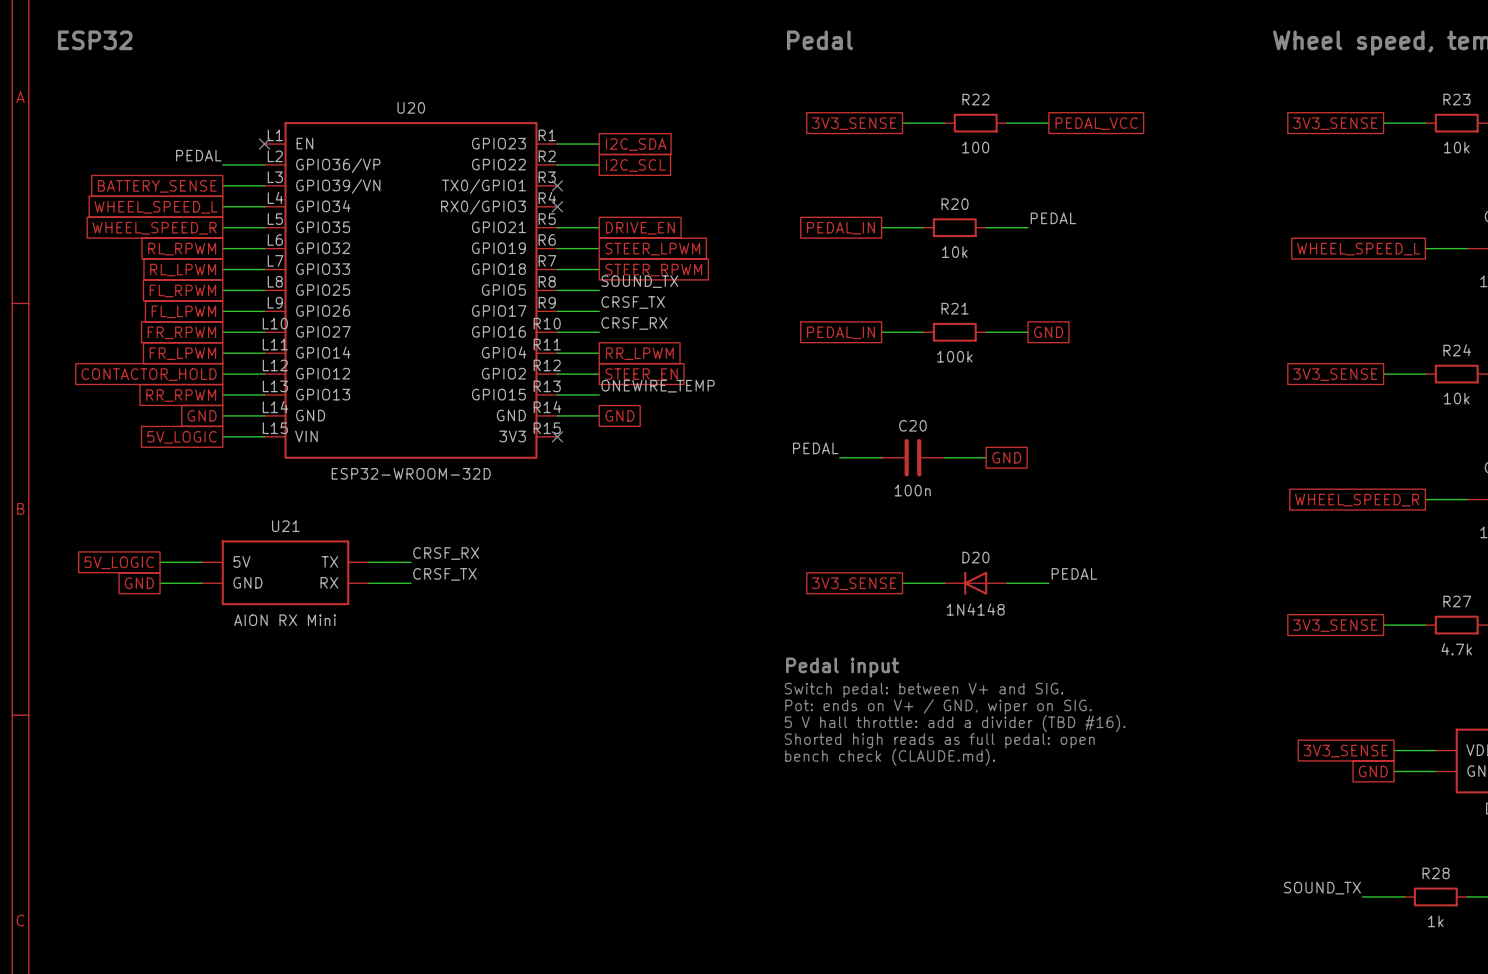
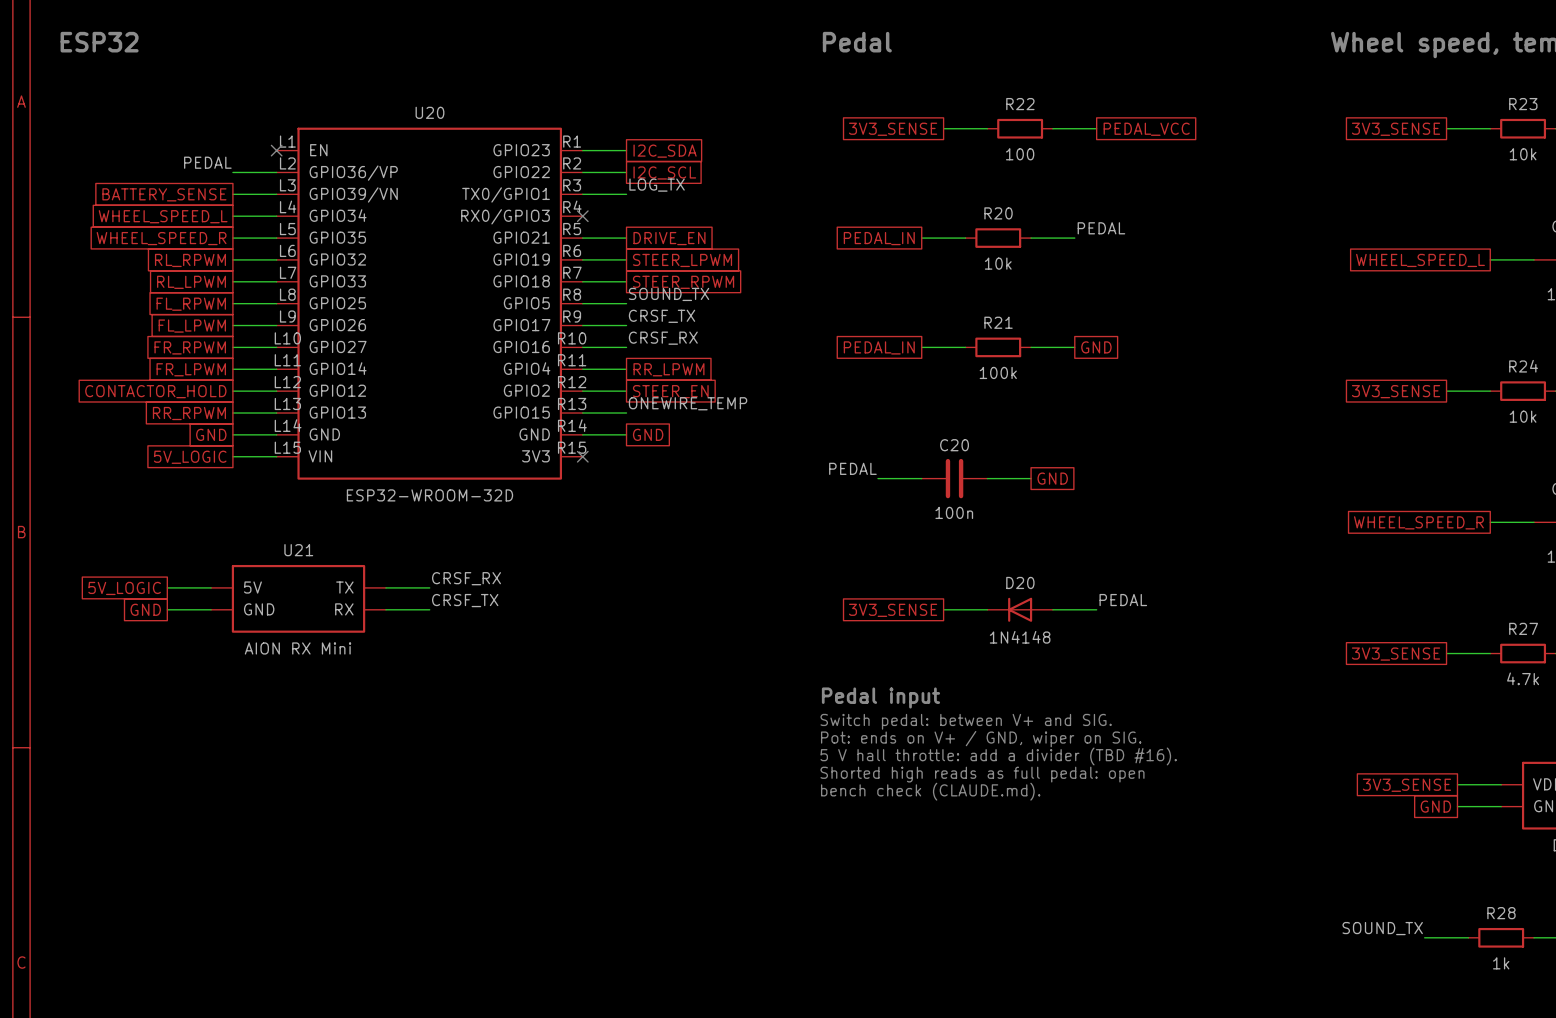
label: none -> LOG_TX (657, 185)
wire: none -> (582, 194) (626, 194)
no-connect mark: (557, 185) -> none

